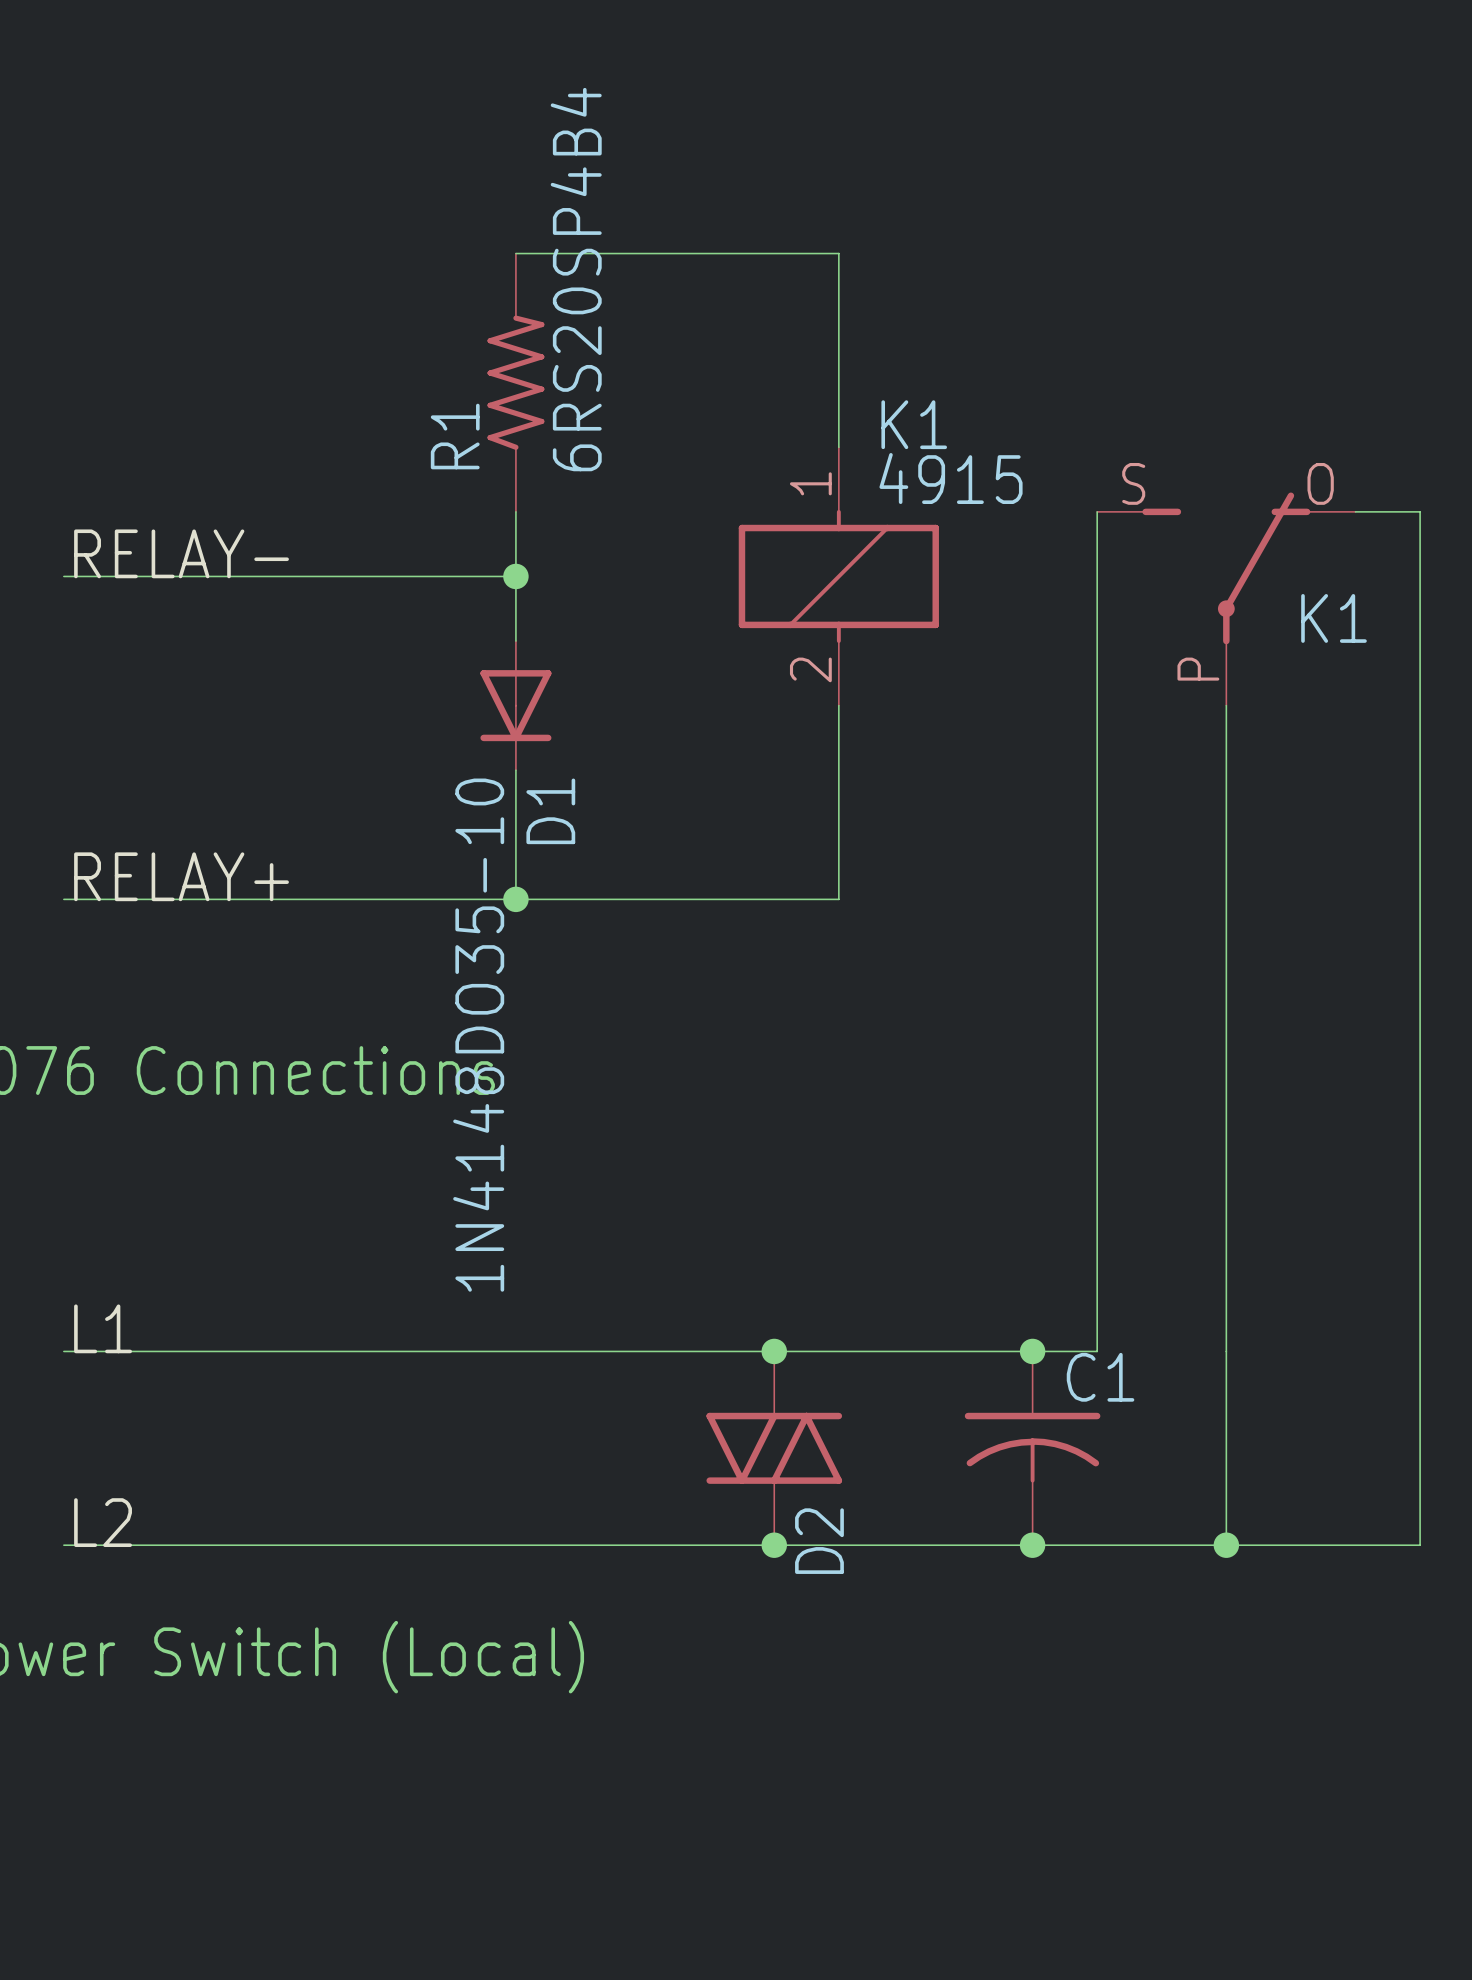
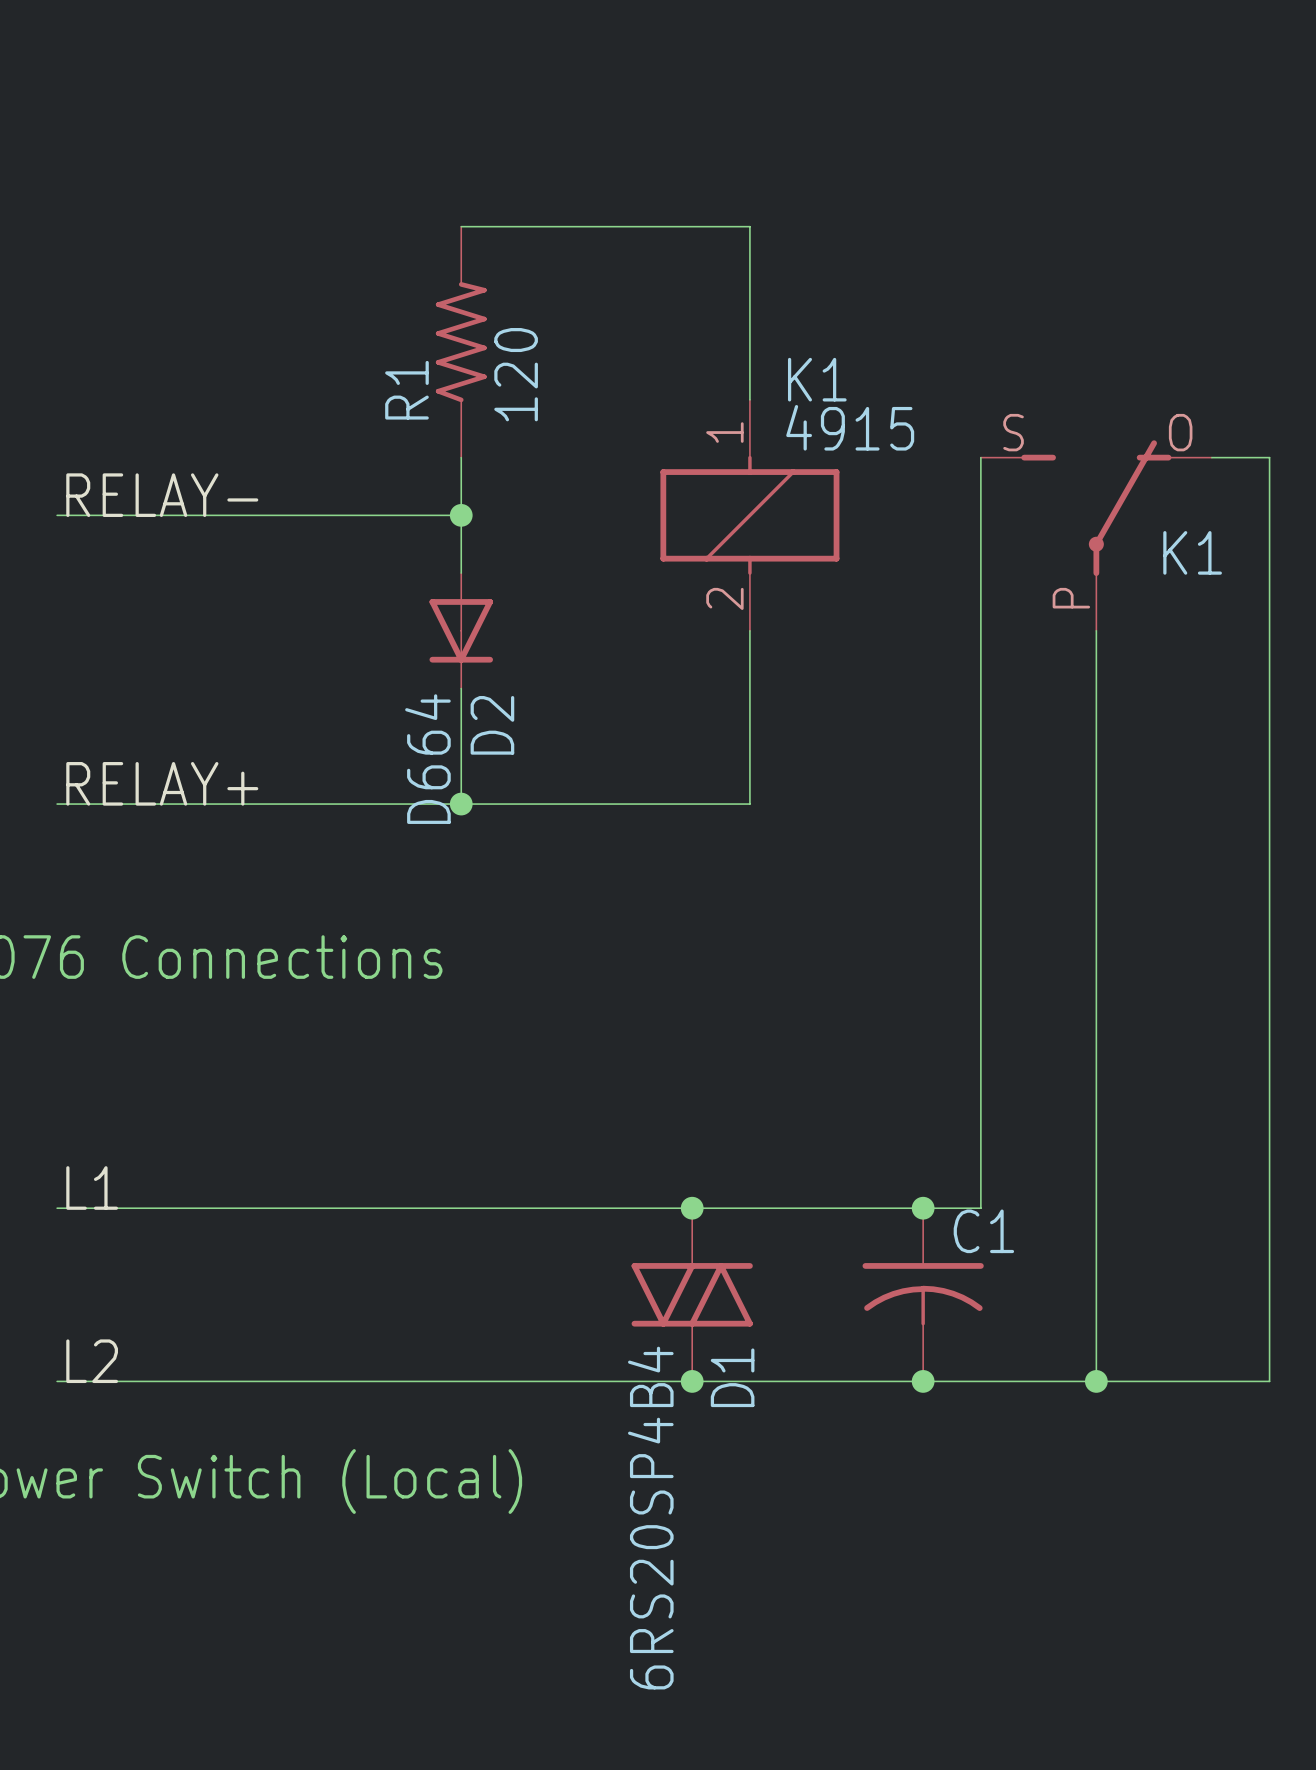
R1 value: 6RS20SP4B4 (576, 279) -> 120 (516, 374)
D1 name: D1 (550, 811) -> D2 (492, 725)
D1 value: 1N4148DO35-10 (478, 1035) -> D664 (427, 759)
D2 name: D2 (819, 1541) -> D1 (732, 1377)
D2 value: none -> 6RS20SP4B4 (650, 1518)

